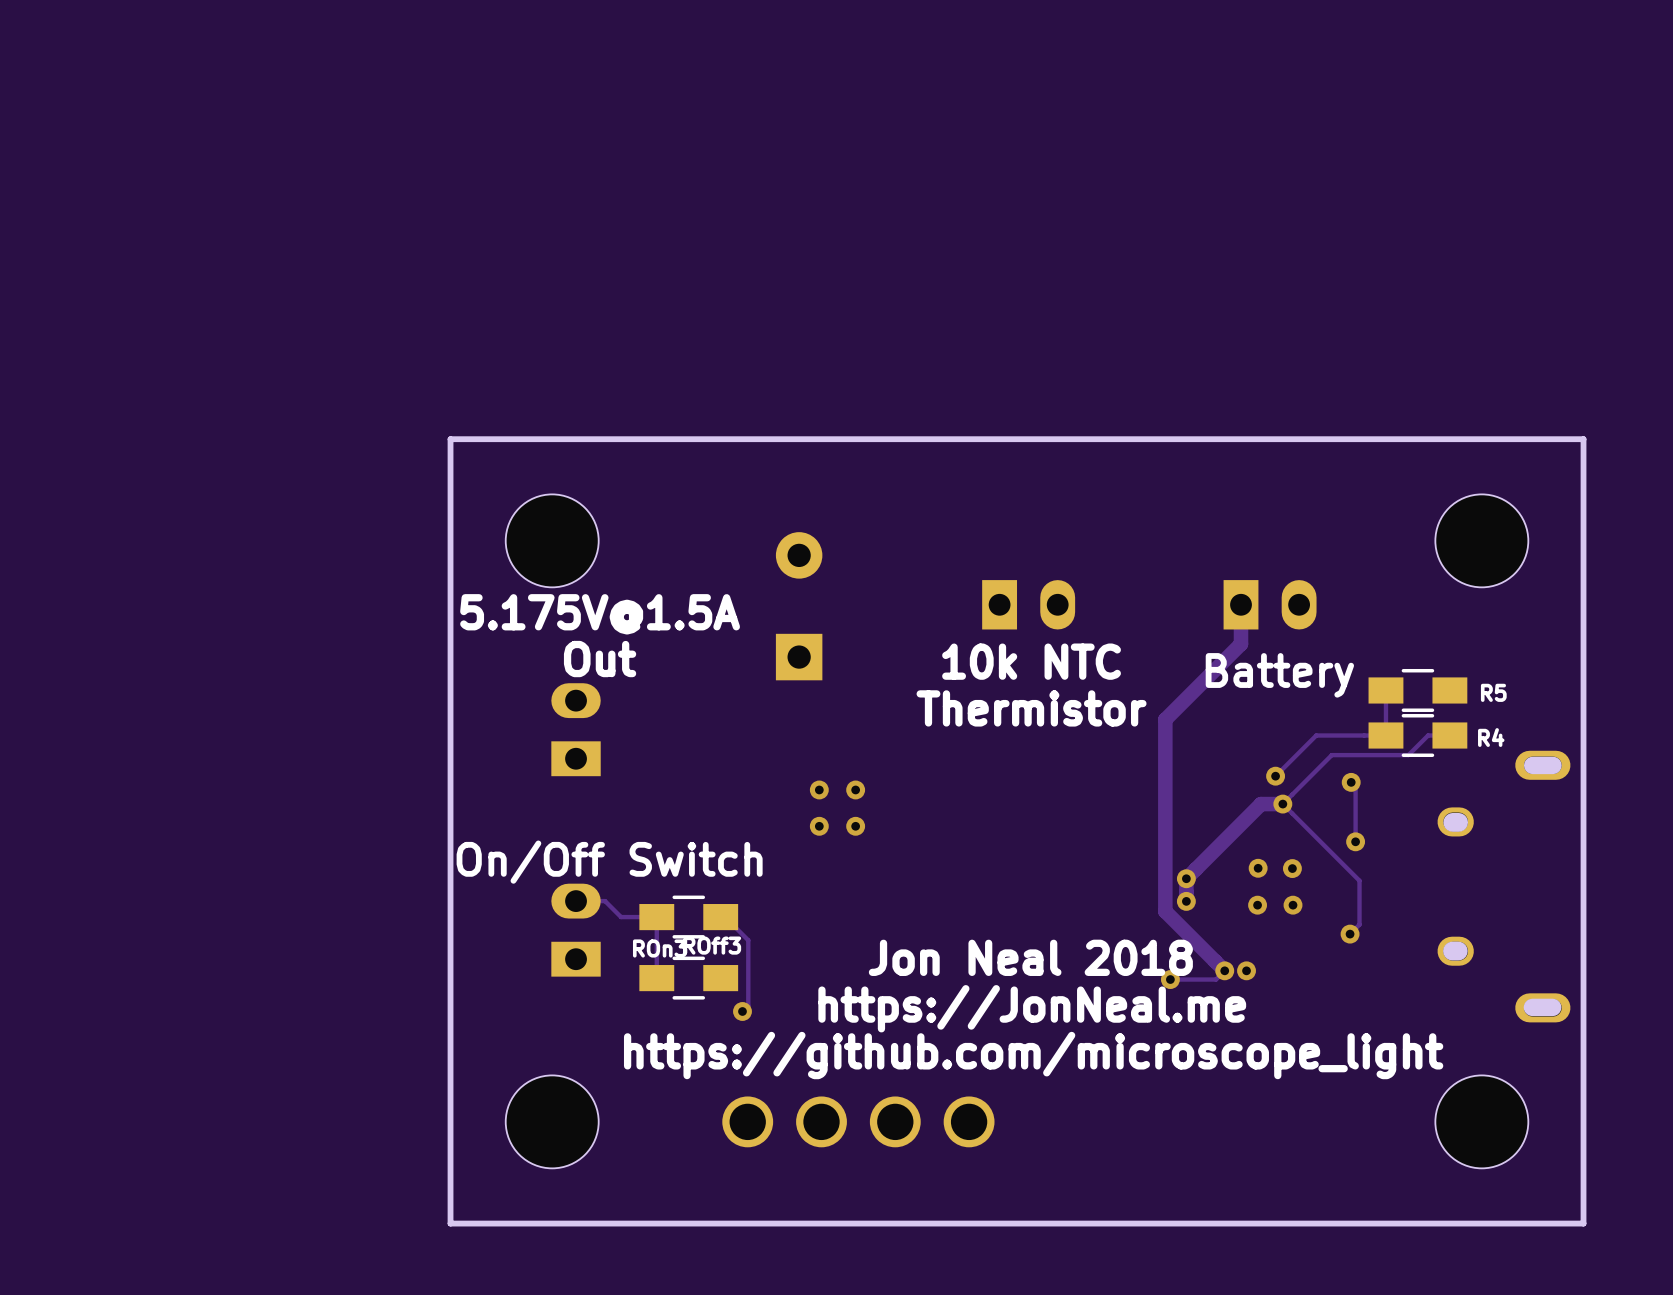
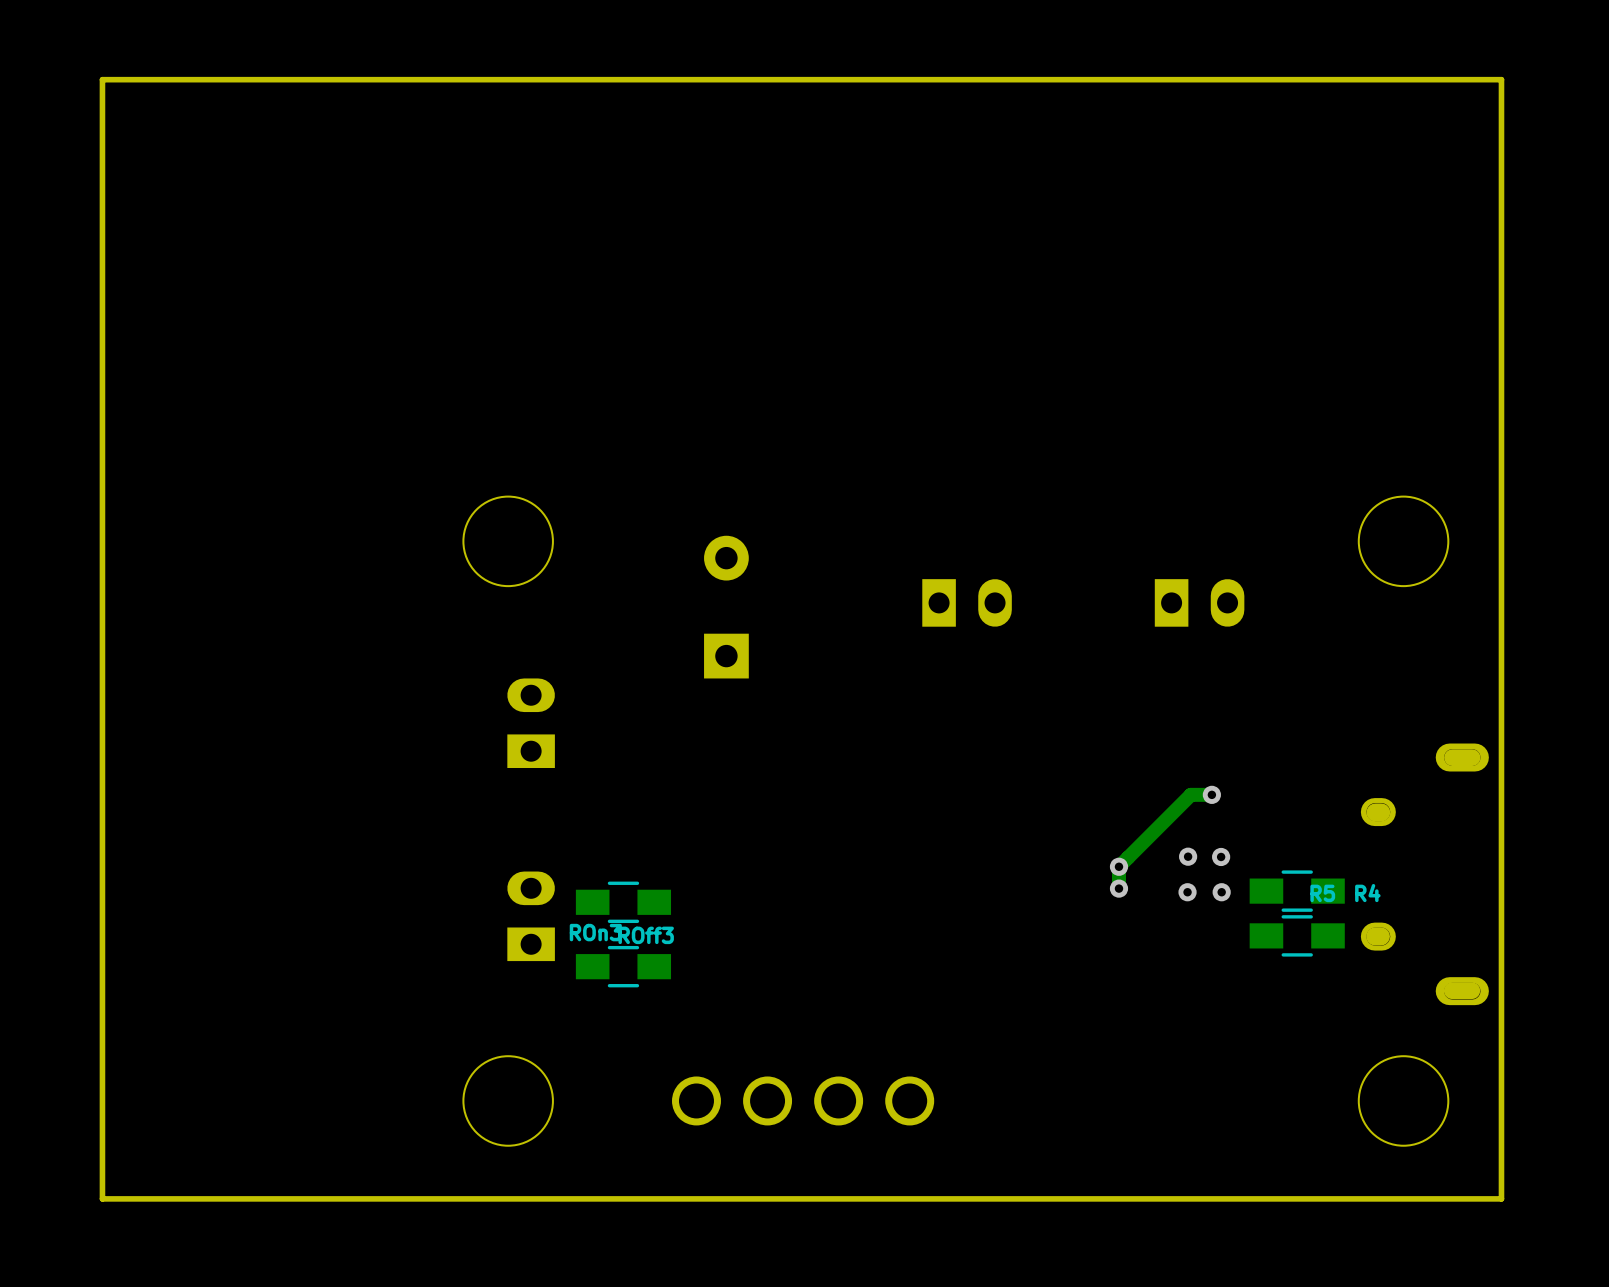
board edge: (1583, 439) (450, 439) (450, 1223) -> (1501, 443) (1501, 79) (102, 79) (102, 1198) (410, 1198)
track: (1241, 604) (1241, 643) (1165, 719) (1165, 911) (1224, 970) (1216, 979) (1170, 979) -> none
part position: (799, 606) -> (726, 607)
text: 5.175V@1.5A (600, 614) -> none
text: Out (600, 659) -> none
text: 10k NTC (1031, 661) -> none
text: Battery (1279, 675) -> none
track: (1385, 690) (1385, 735) (1316, 735) (1275, 776) -> none
R5 position: (1417, 690) -> (1297, 935)
R5 name position: R5 (1493, 692) -> R5 (1322, 893)
text: Thermistor (1031, 708) -> none
R4 position: (1417, 735) -> (1297, 891)
track: (1449, 735) (1428, 735) (1408, 755) (1331, 755) (1282, 804) (1359, 880) (1359, 924) (1350, 934) -> none
via: (1275, 776) -> none
track: (1351, 782) (1355, 786) (1355, 841) -> none
via: (1351, 782) -> none
via: (819, 789) -> none
via: (855, 789) -> none
via: (819, 826) -> none
via: (855, 826) -> none
via: (1355, 841) -> none
text: On/Off Switch (609, 862) -> none
track: (576, 901) (605, 901) (621, 917) (656, 917) (656, 978) -> none
ROn3 position: (688, 917) -> (623, 902)
track: (720, 917) (725, 917) (748, 940) (748, 1005) (742, 1011) -> none
via: (1350, 934) -> none
text: Jon Neal 2018 (1030, 957) -> none
via: (1224, 970) -> none
via: (1246, 970) -> none
ROff3 position: (688, 978) -> (623, 966)
via: (1170, 979) -> none
text: https://JonNeal.me (1032, 1008) -> none
via: (742, 1011) -> none
text: https://github.com/microscope_light (1033, 1055) -> none

